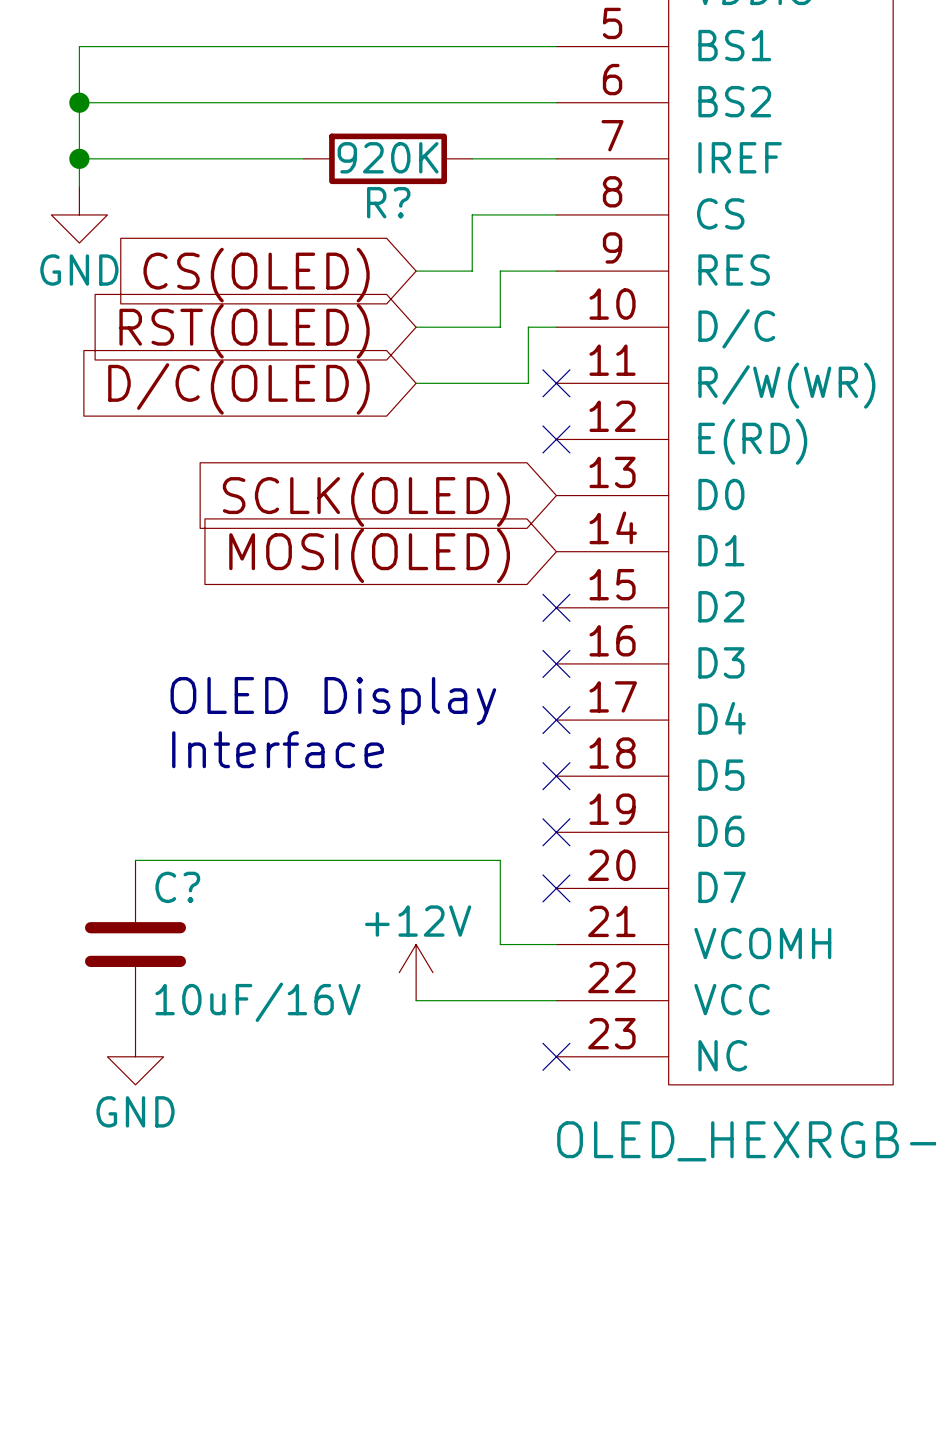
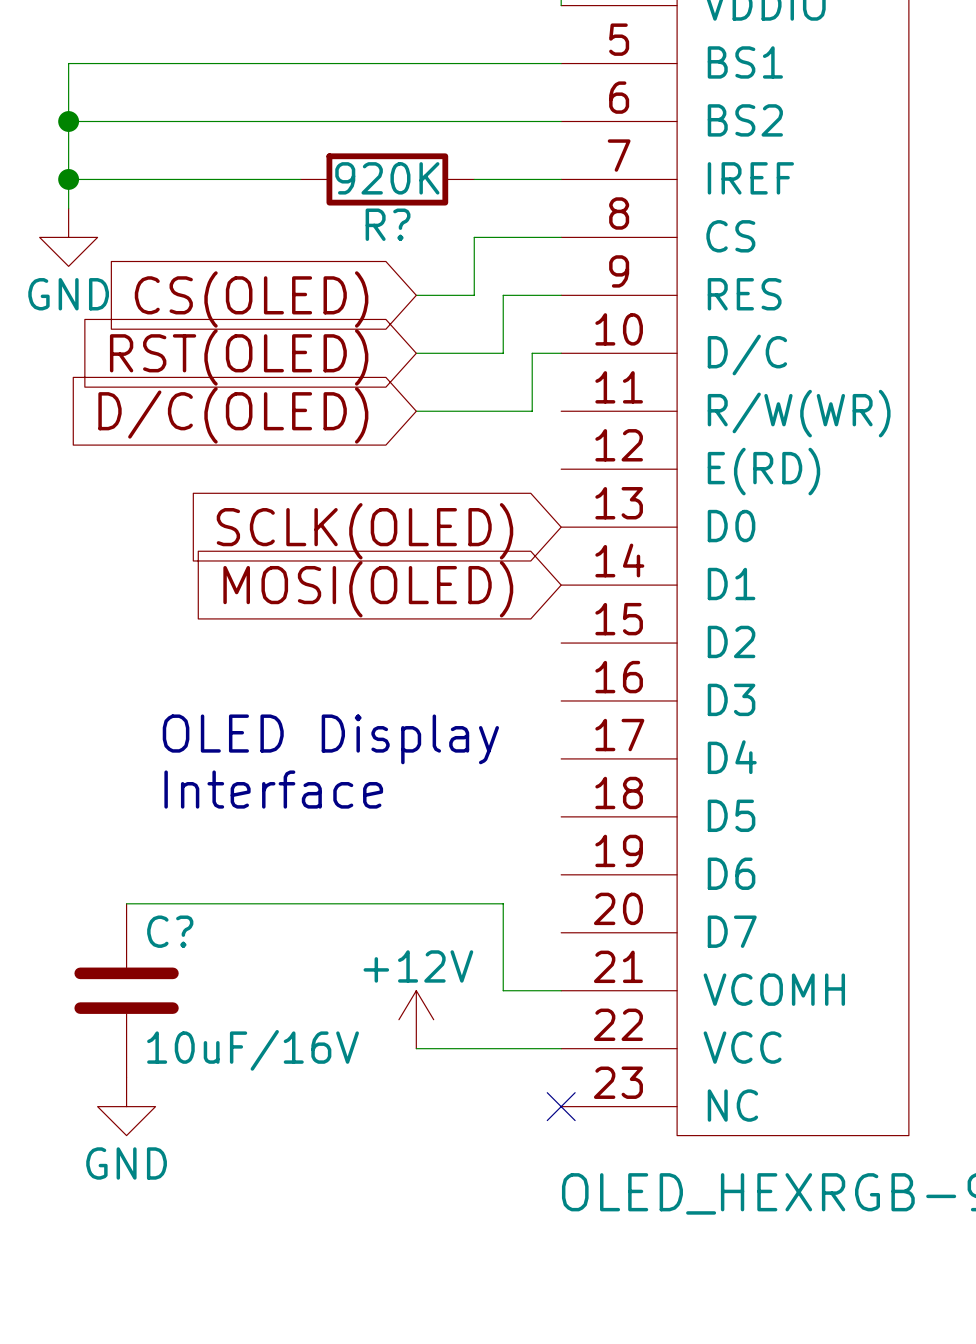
no-connect mark: (556, 383) -> none
no-connect mark: (556, 439) -> none
no-connect mark: (556, 607) -> none
no-connect mark: (556, 663) -> none
no-connect mark: (556, 720) -> none
no-connect mark: (556, 776) -> none
no-connect mark: (556, 832) -> none
no-connect mark: (556, 888) -> none

